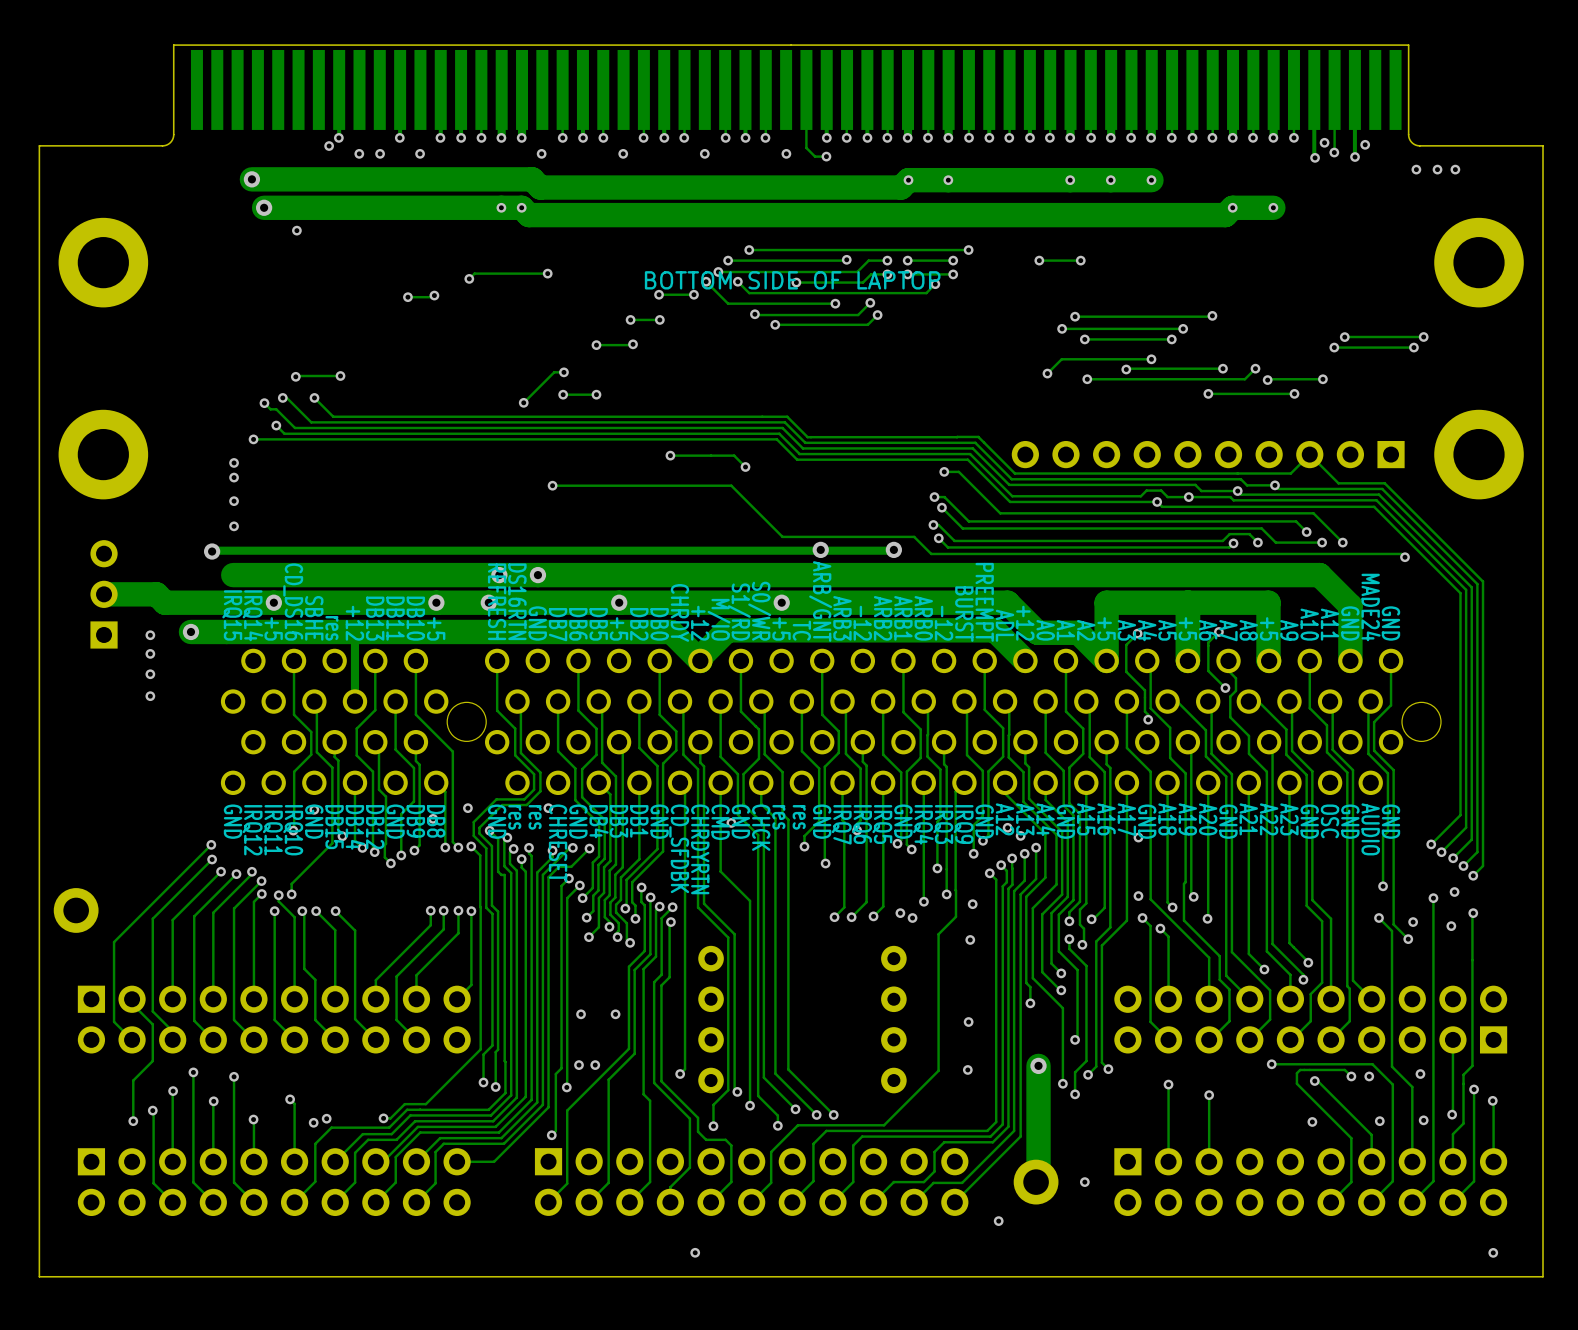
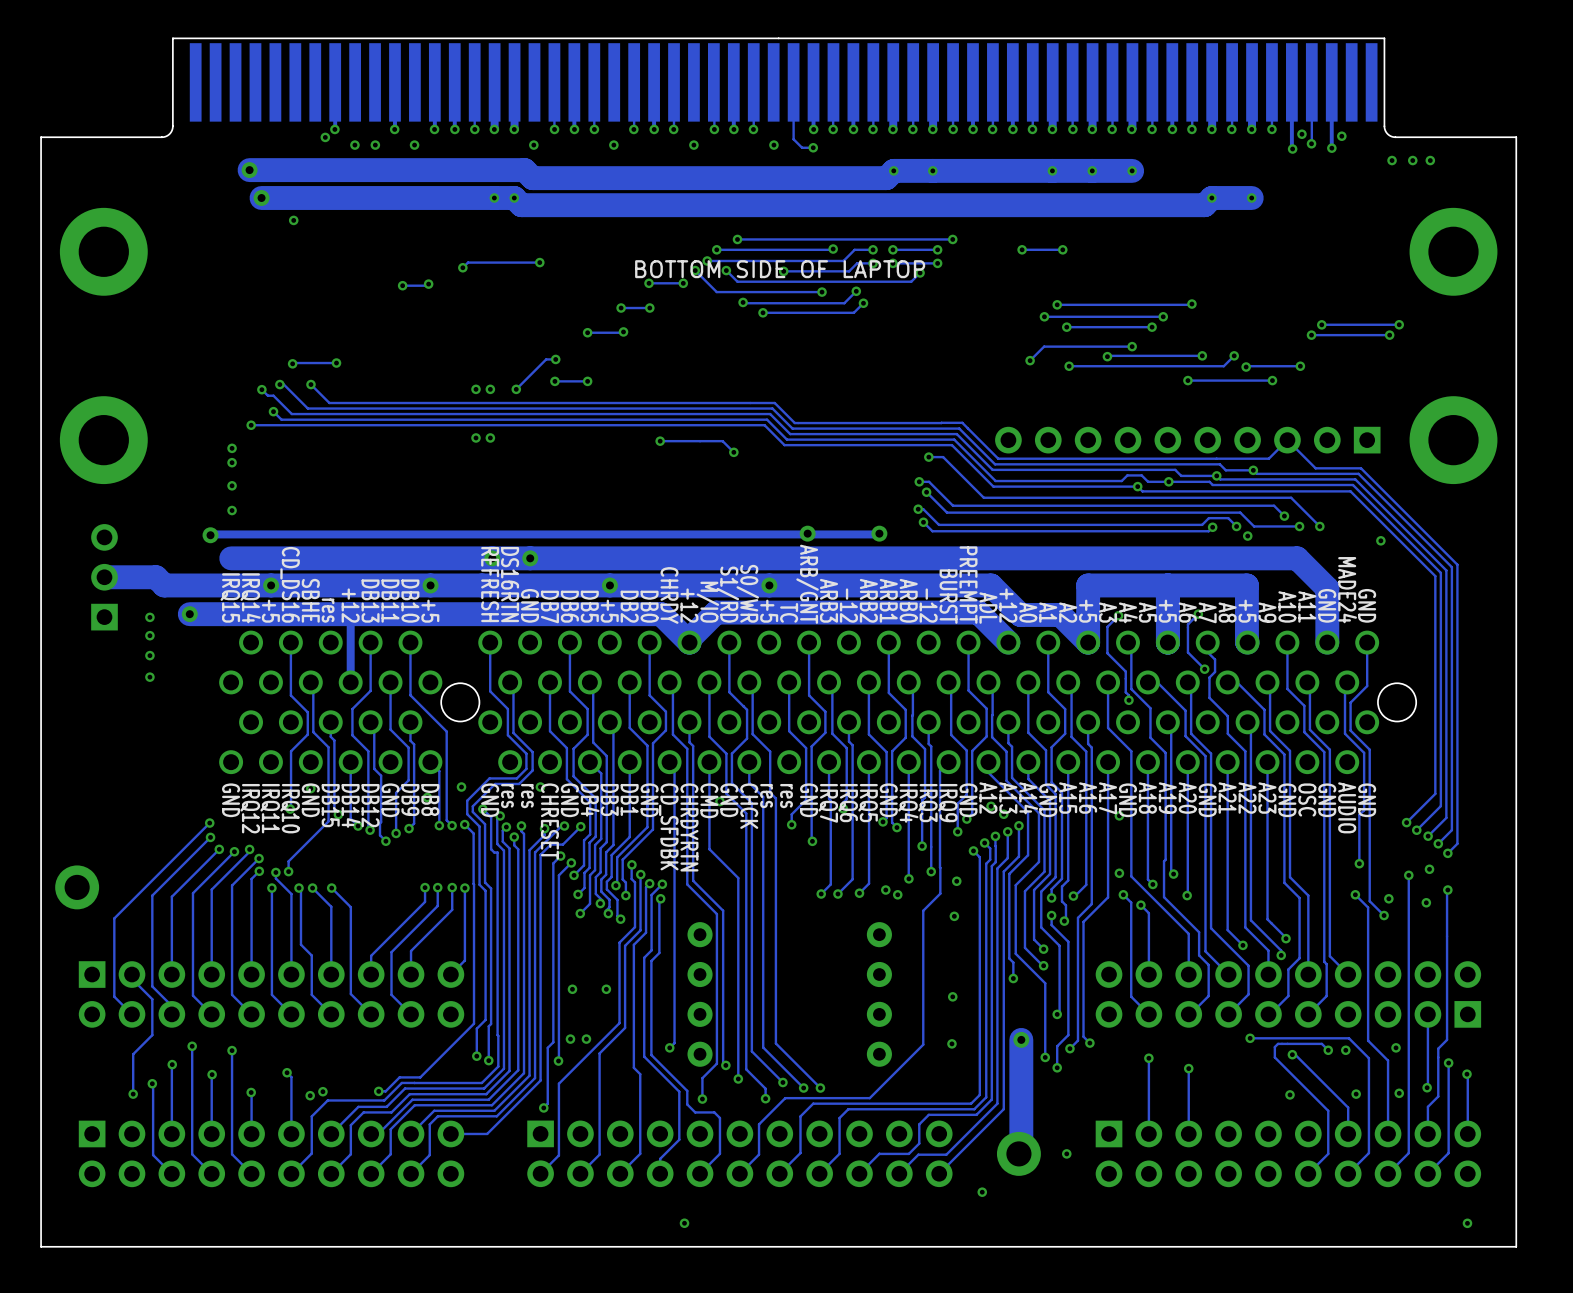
via: none -> (476, 389)
via: none -> (490, 389)
via: none -> (476, 437)
via: none -> (490, 437)
track: (552, 485) (731, 485) (782, 536) (914, 536) (931, 553) (1401, 553) (1405, 557) -> none
via: (552, 485) -> none
via: none -> (1247, 536)
via: (488, 602) -> none

